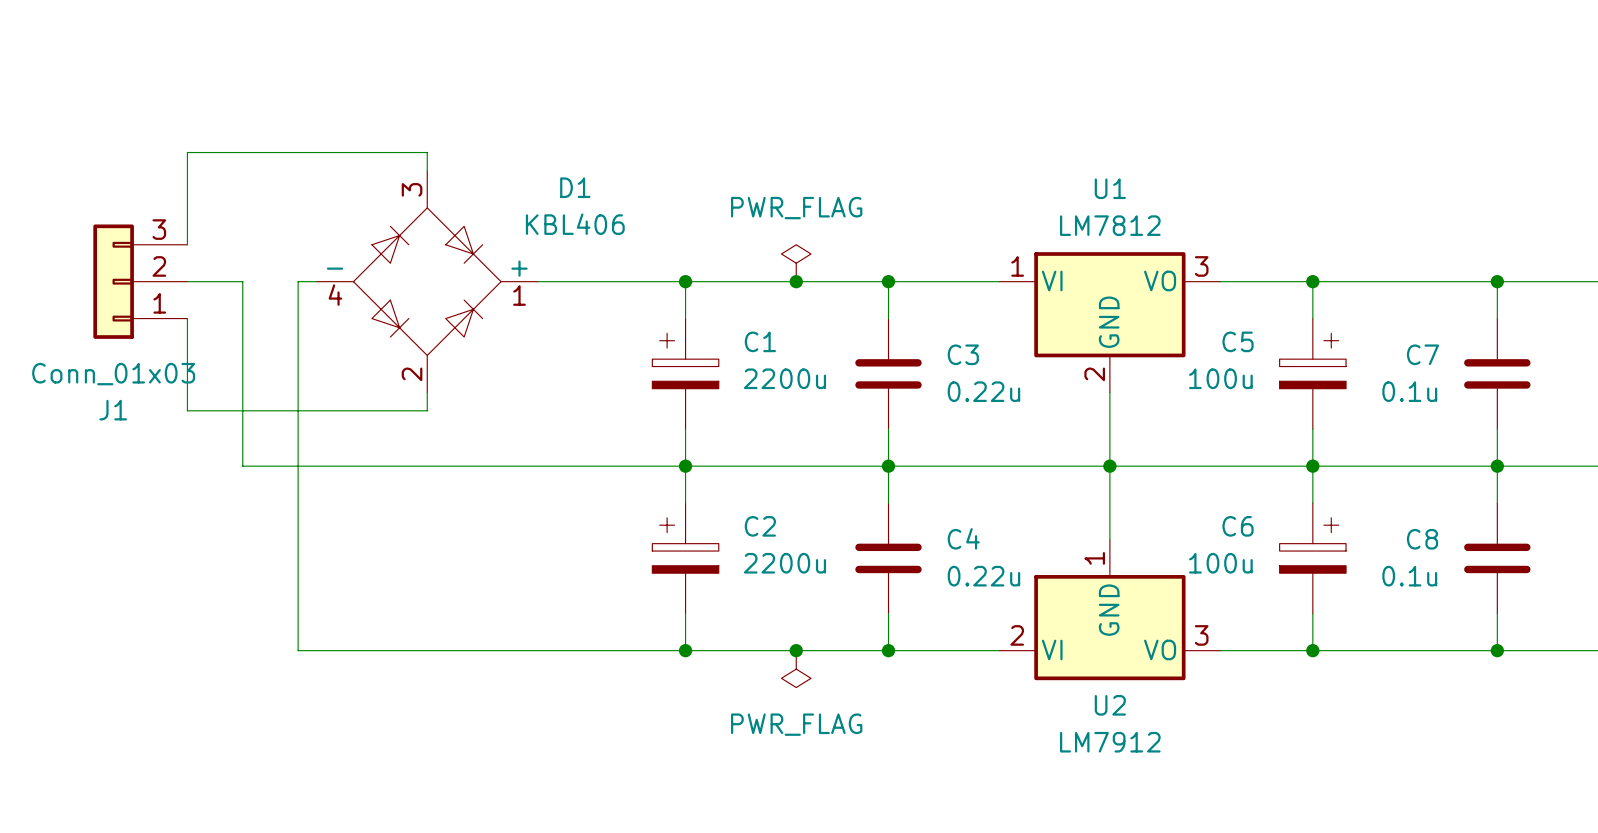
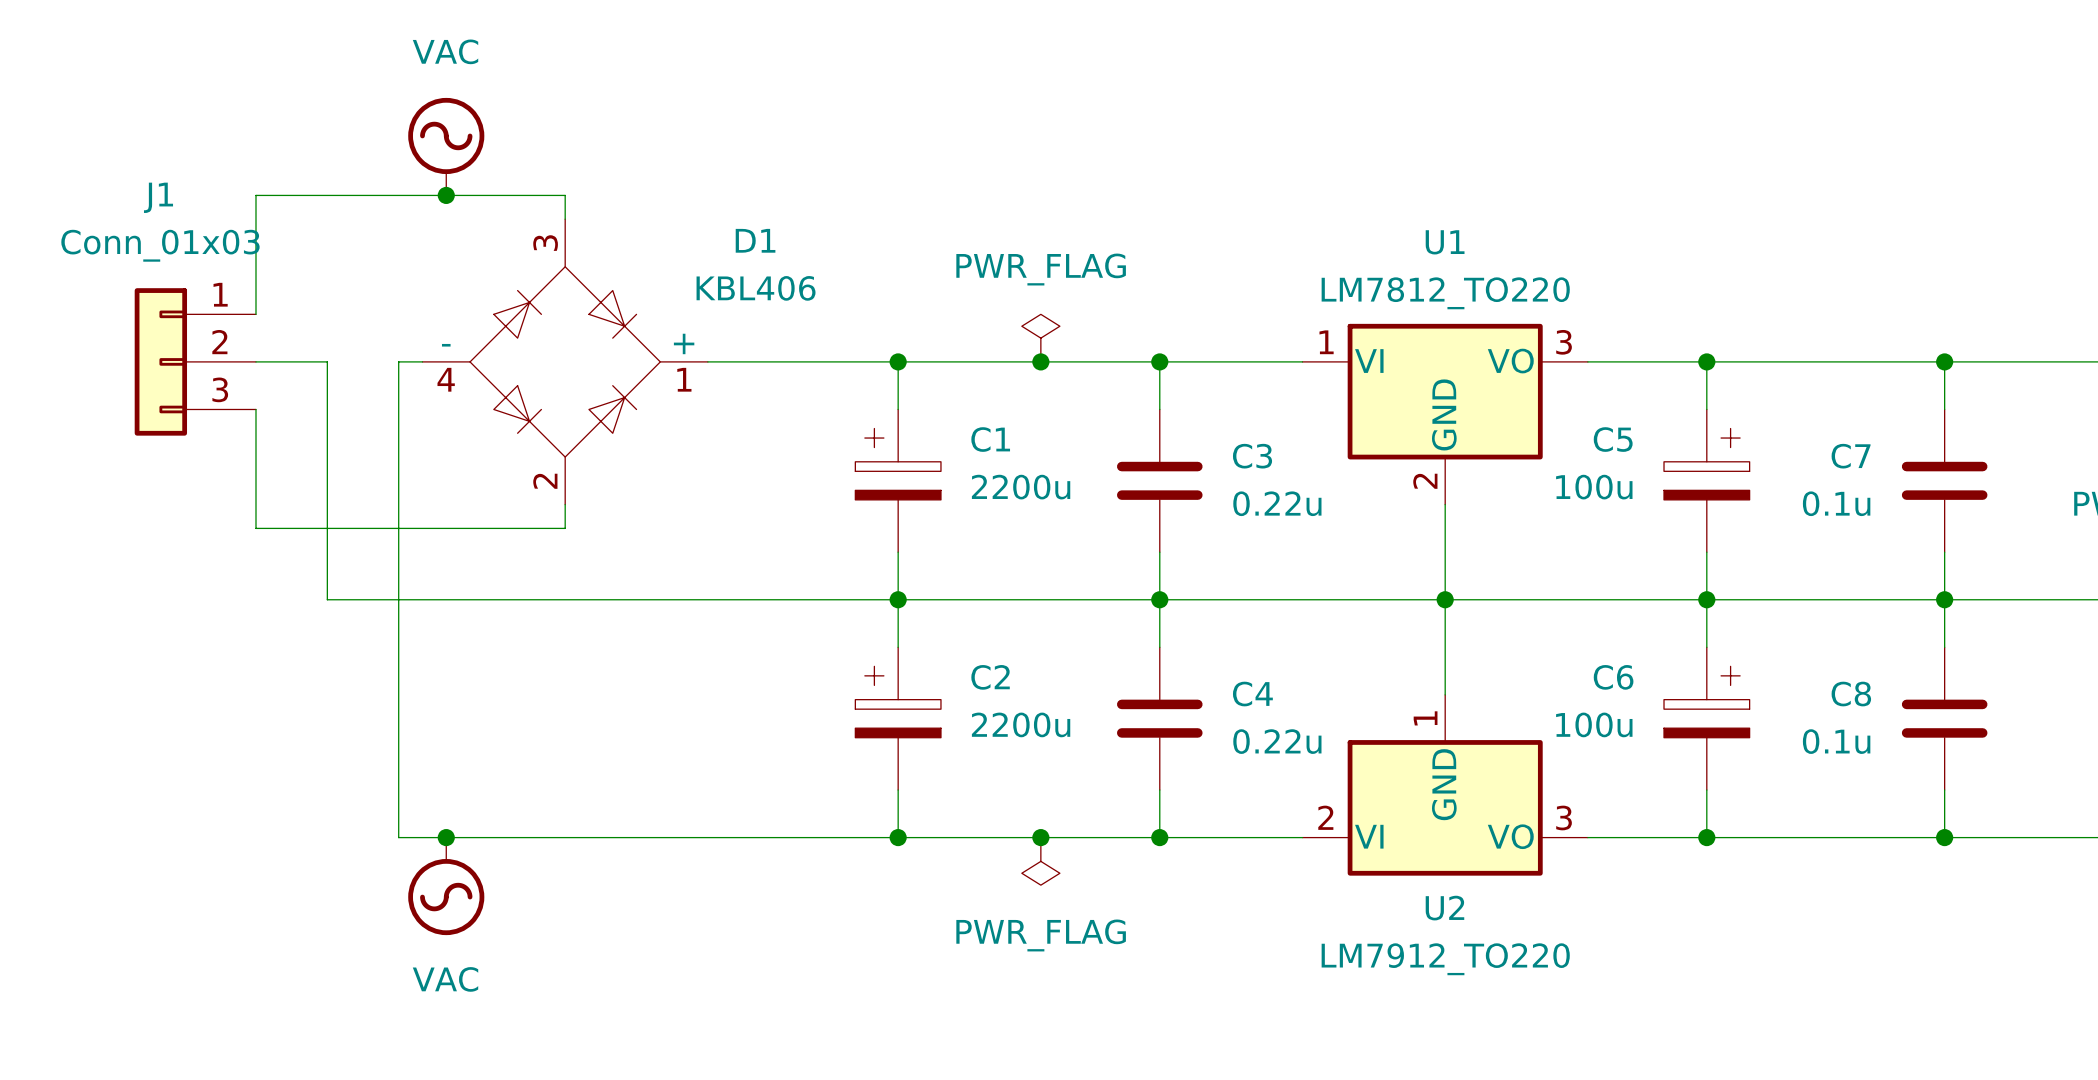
power symbol: none -> VAC (446, 146)
junction: none -> (446, 195)
U1 value: LM7812 (1110, 225) -> LM7812_TO220 (1445, 293)
J1 flip: as is (113, 281) -> up-down (160, 361)
junction: none -> (446, 837)
power symbol: none -> VAC (446, 886)
U2 value: LM7912 (1110, 742) -> LM7912_TO220 (1445, 959)

